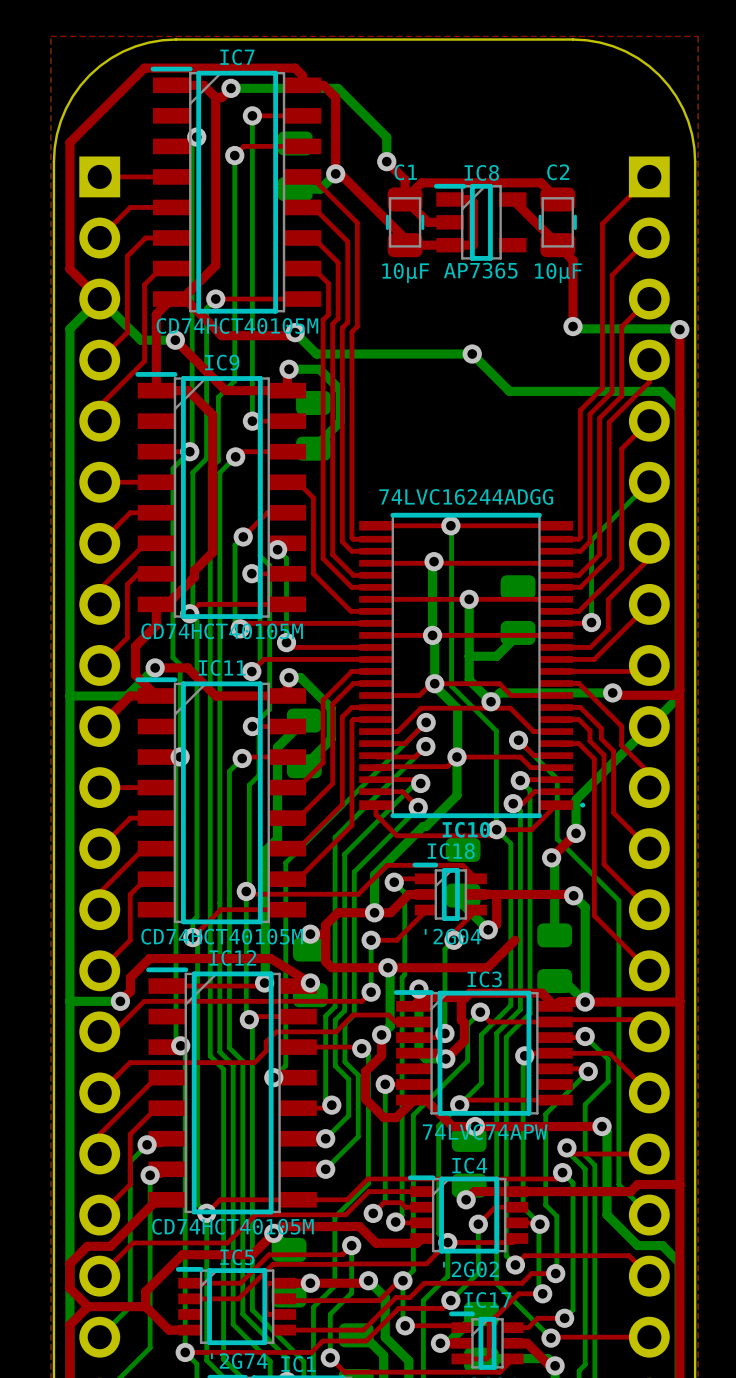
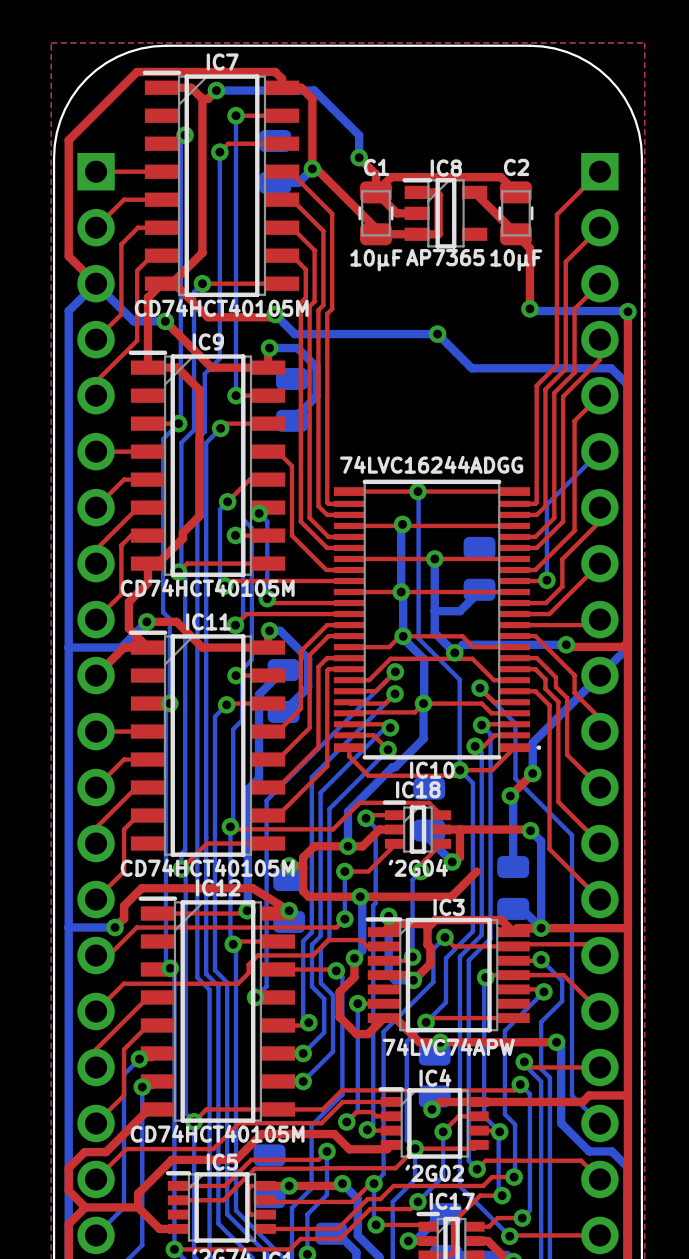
via: (273, 1233) -> none

